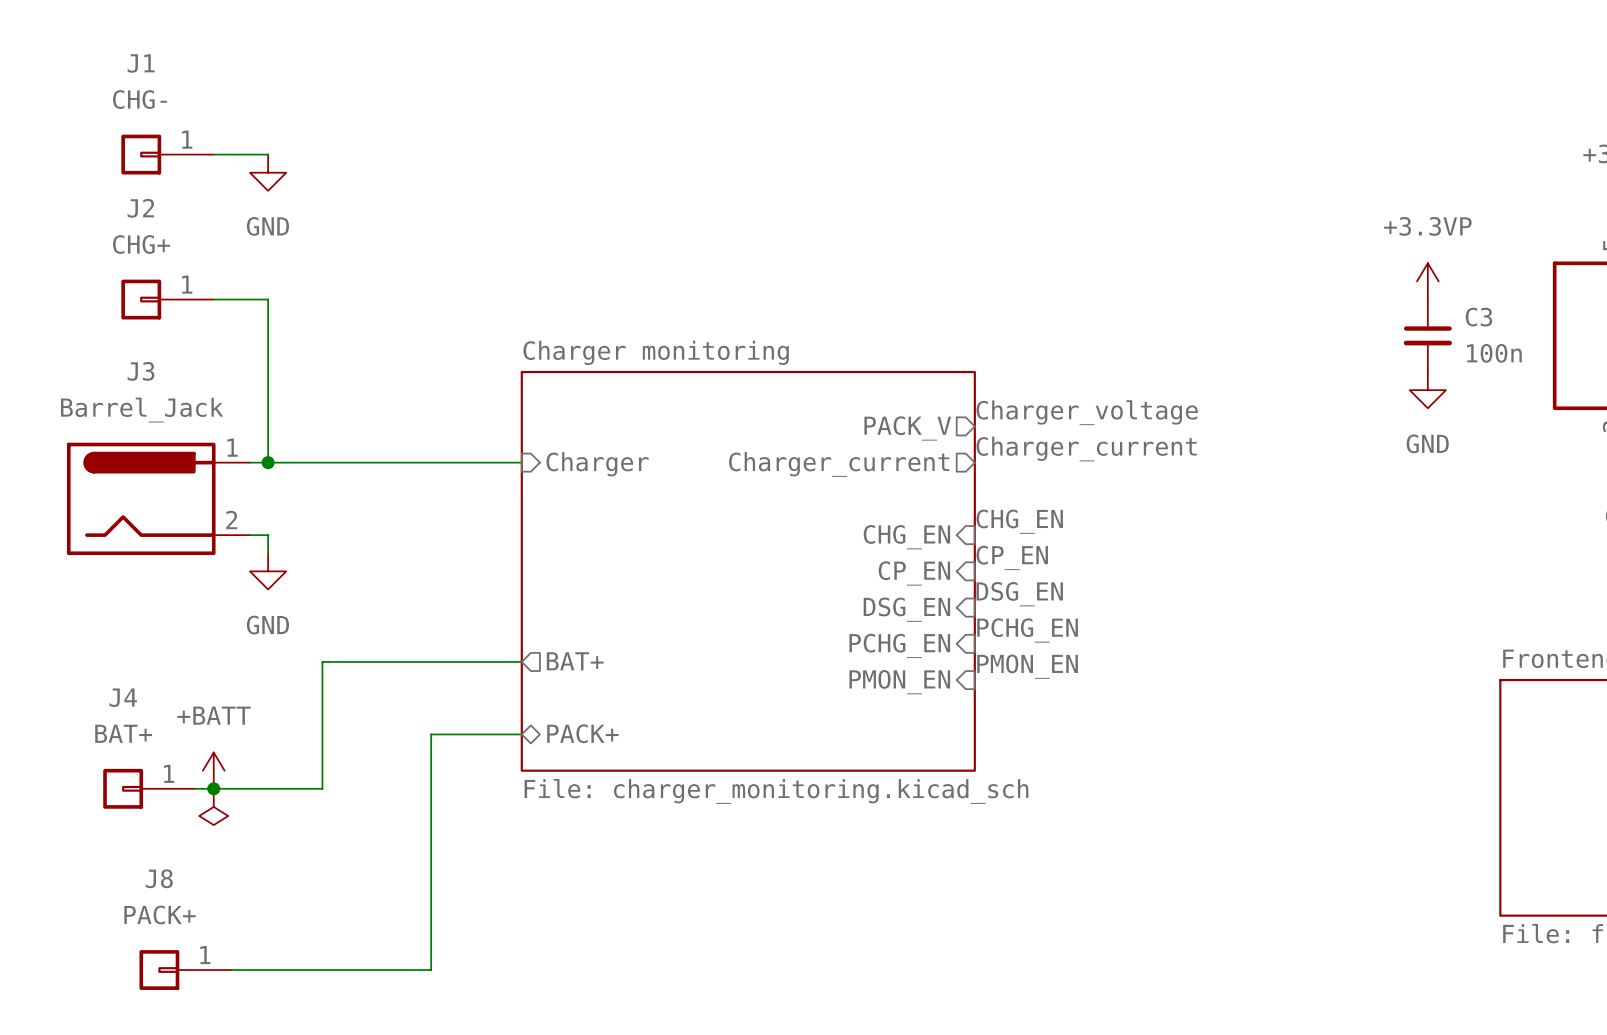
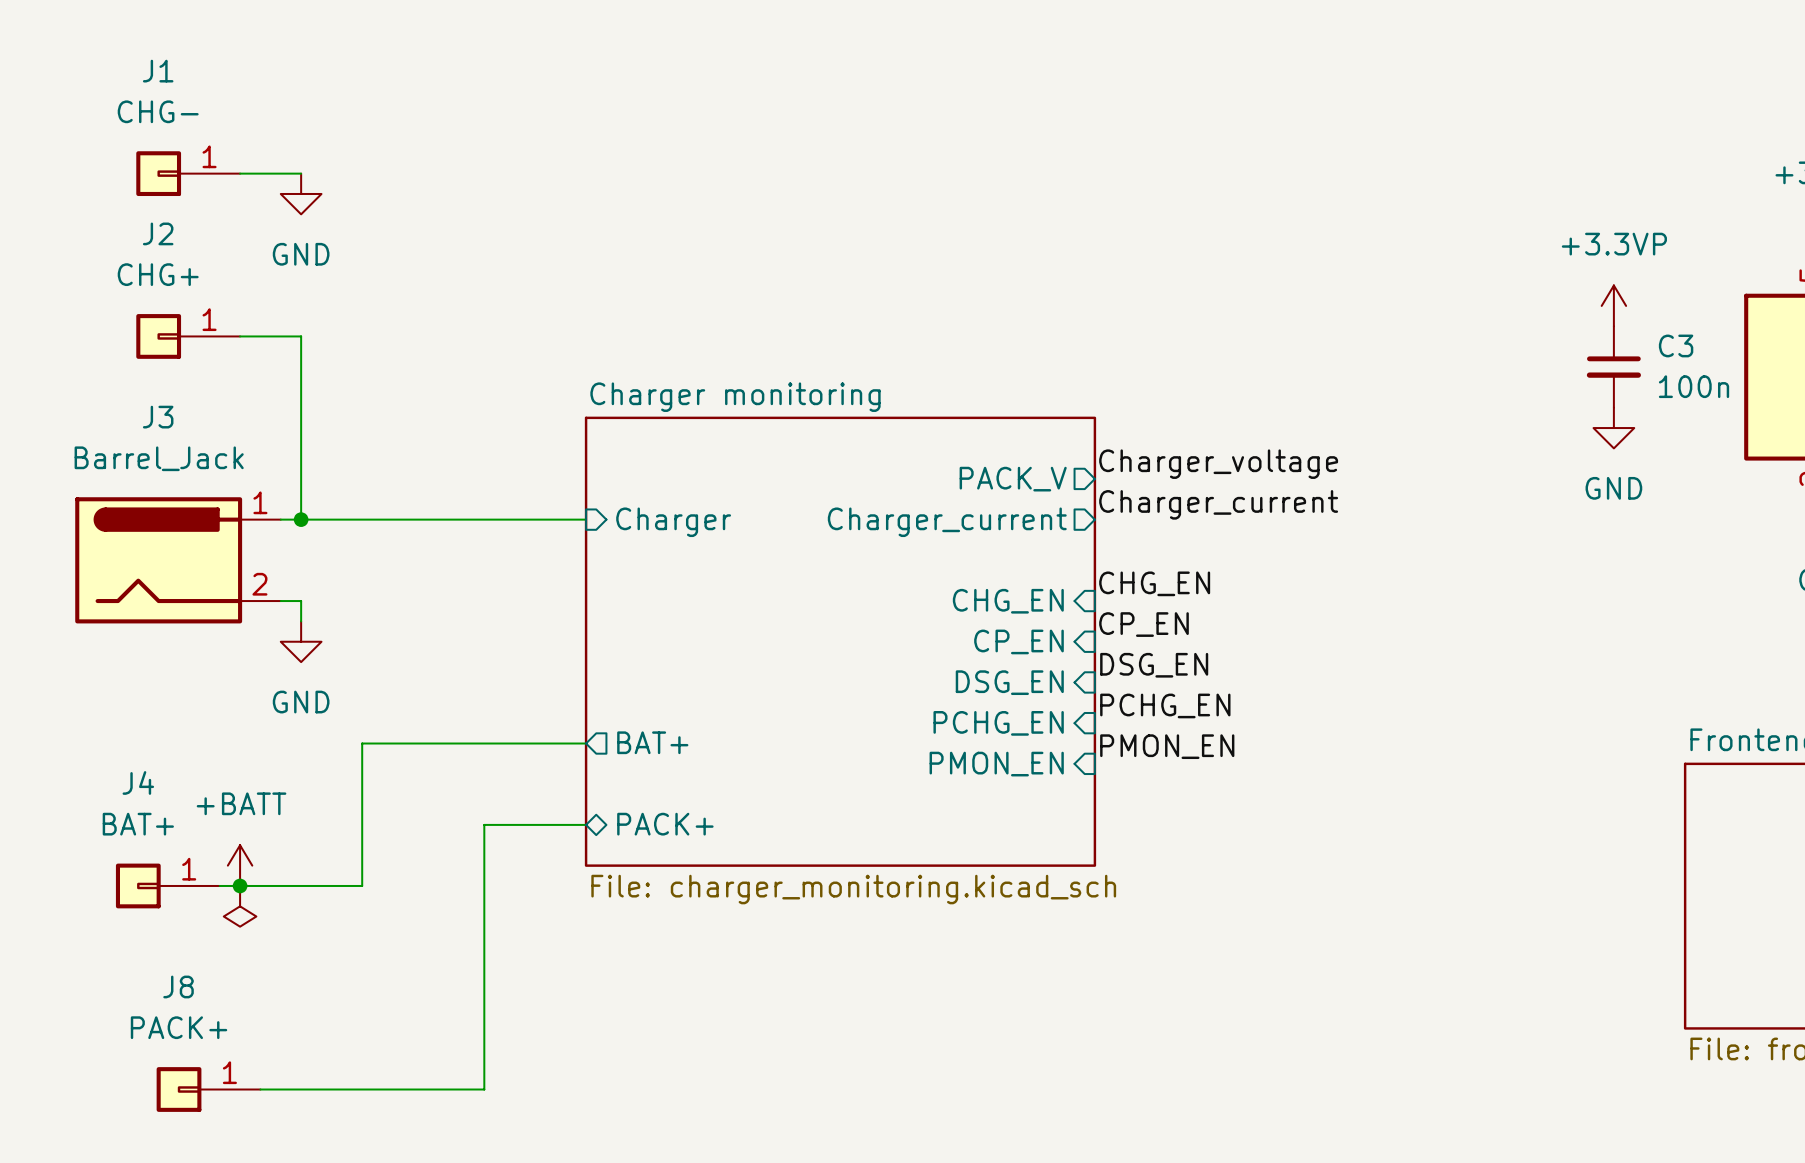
power symbol position: +3.3VP (1427, 281) -> +3.3VP (1613, 305)
C3 position: (1427, 335) -> (1613, 366)
power symbol position: GND (1427, 390) -> GND (1613, 428)

